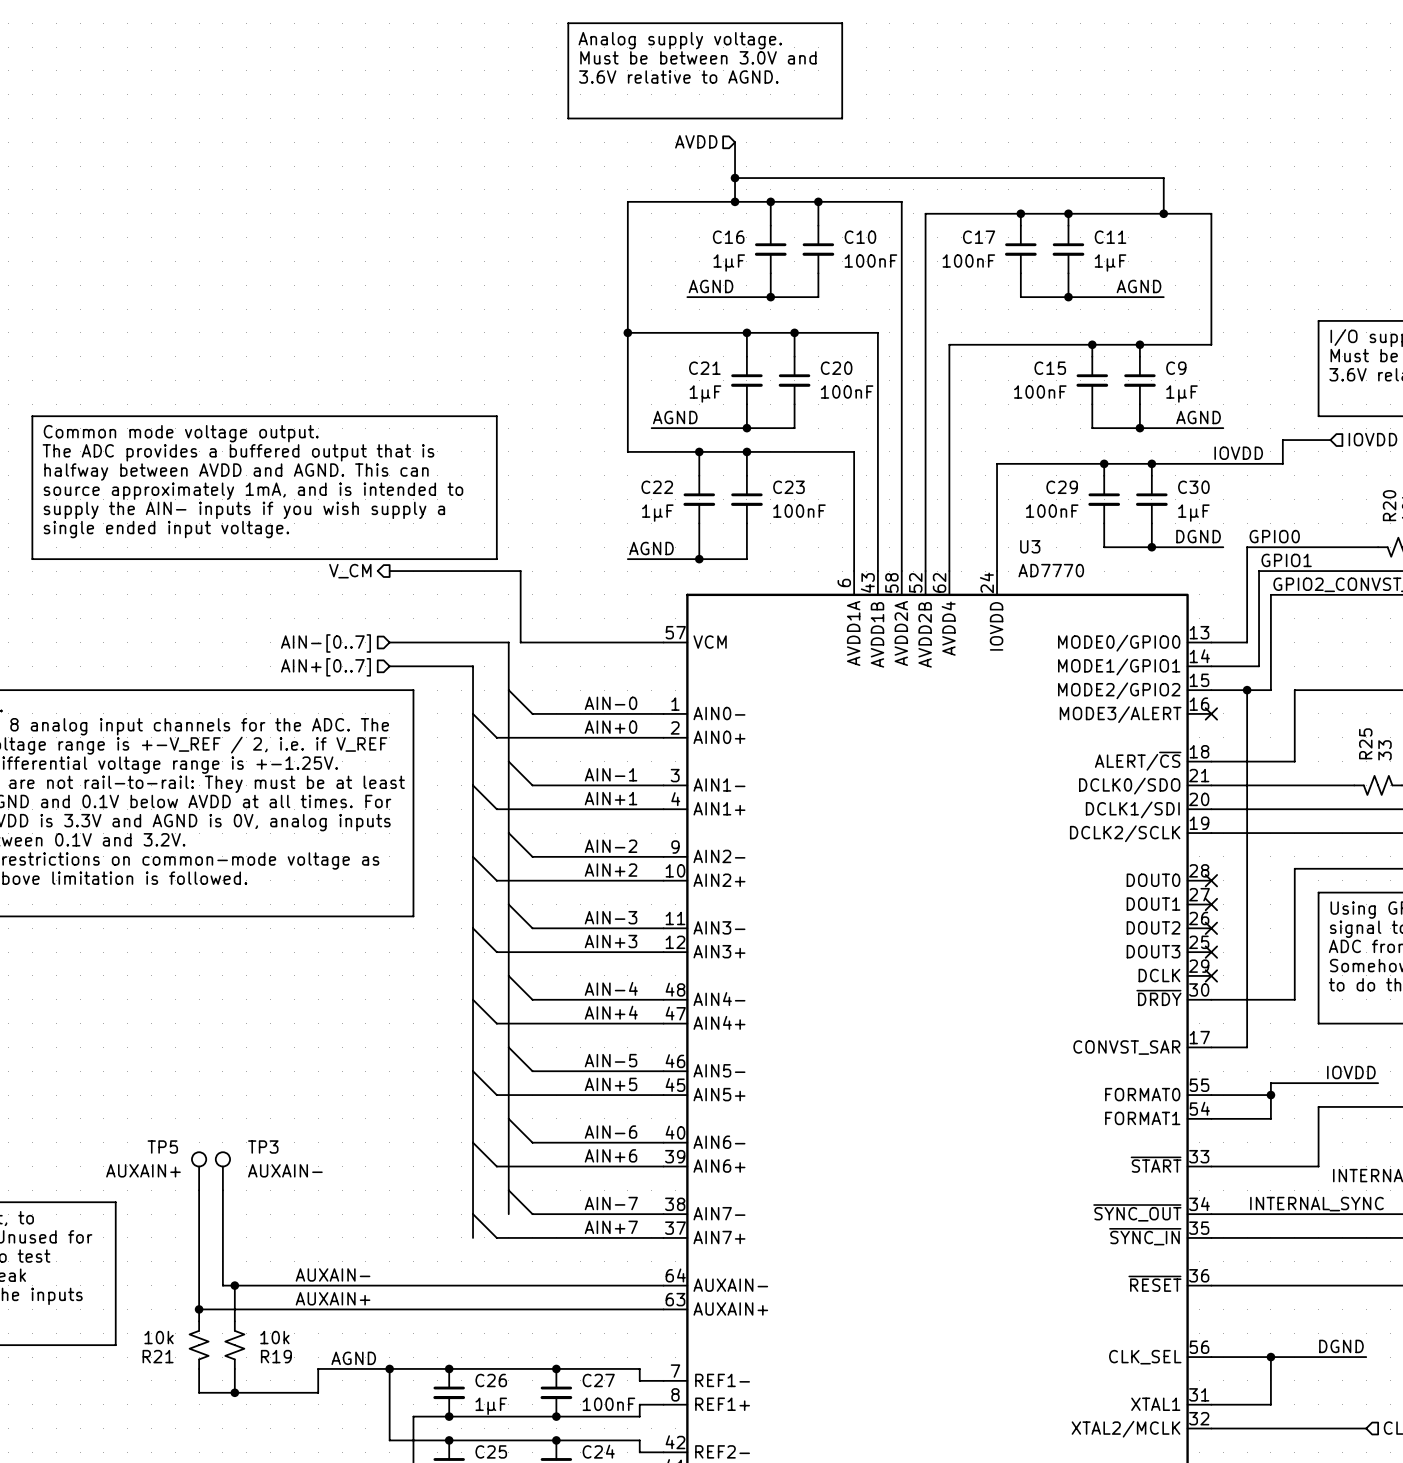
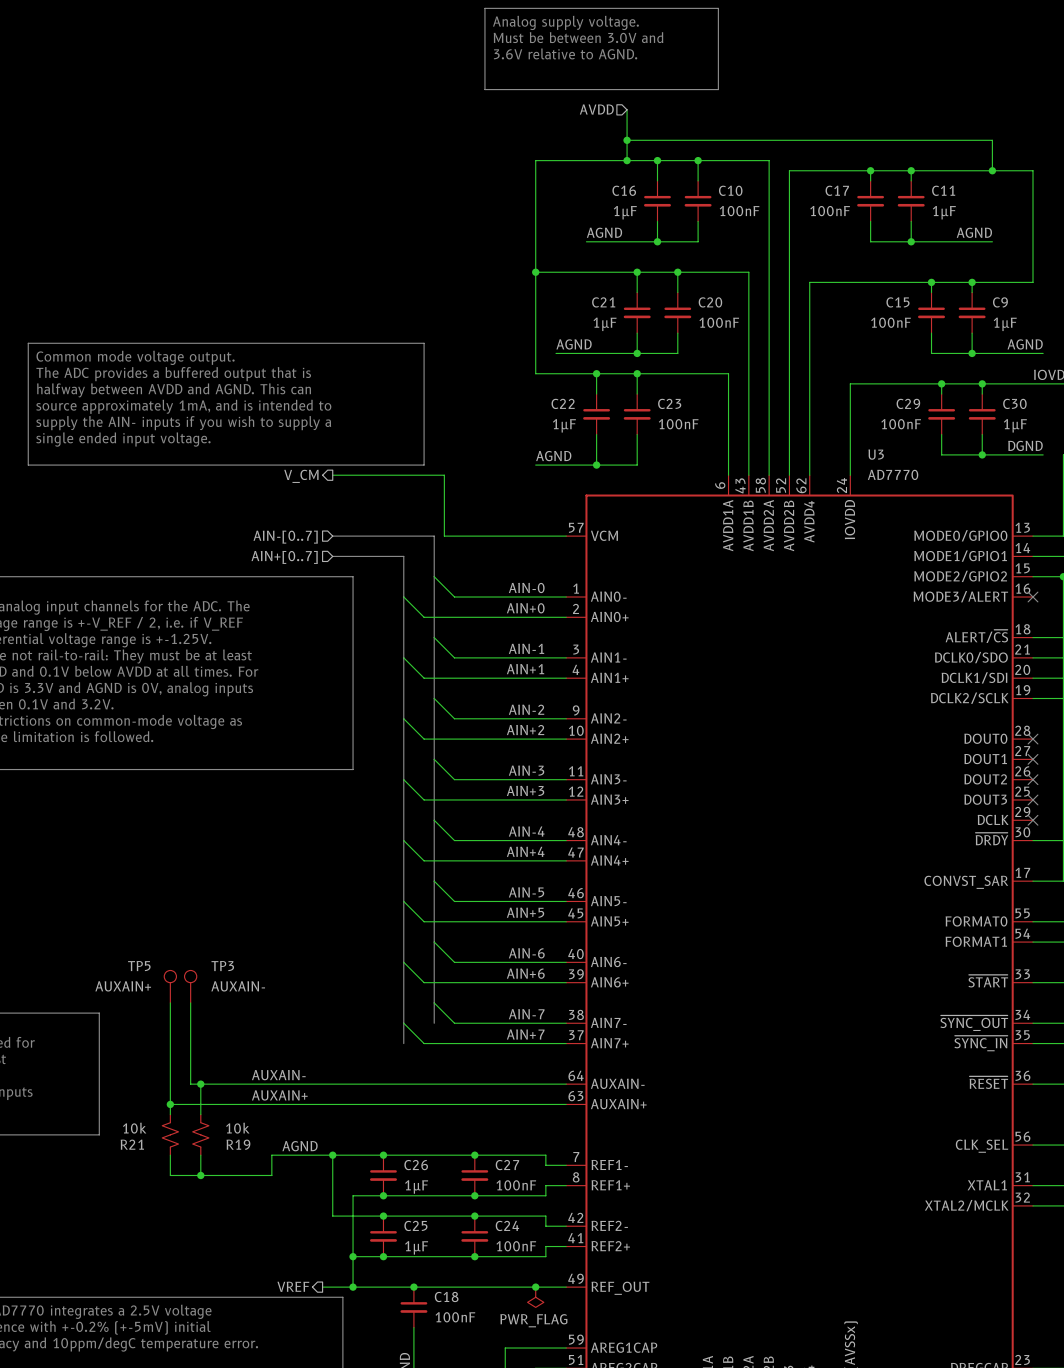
text: supply the AIN- inputs if you wish supply a (244, 510) -> supply the AIN- inputs if you wish to supply a (183, 423)

